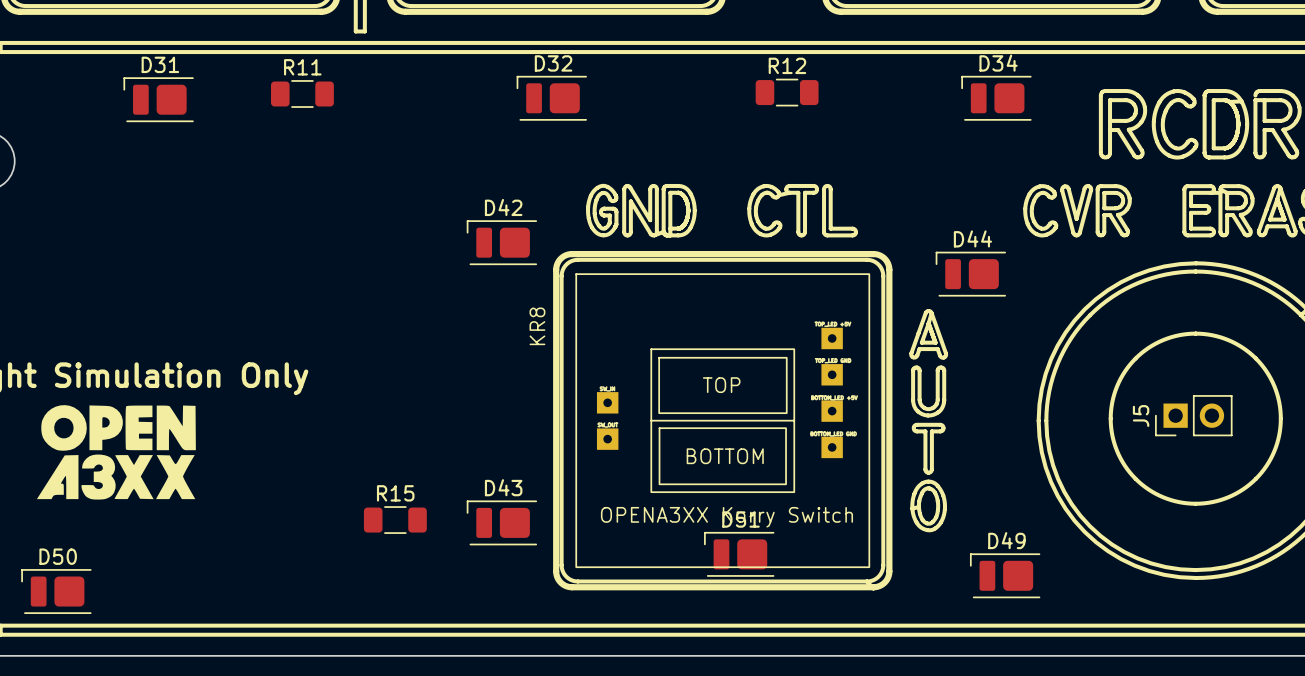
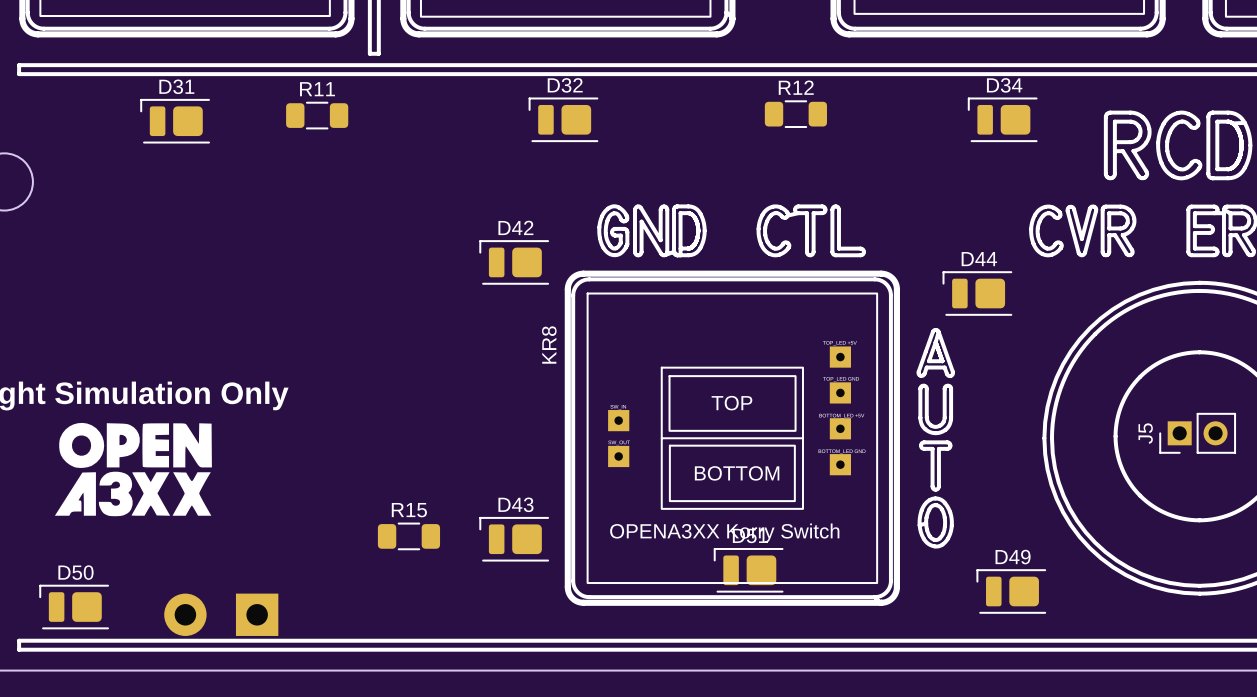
part: none -> (221, 614)

